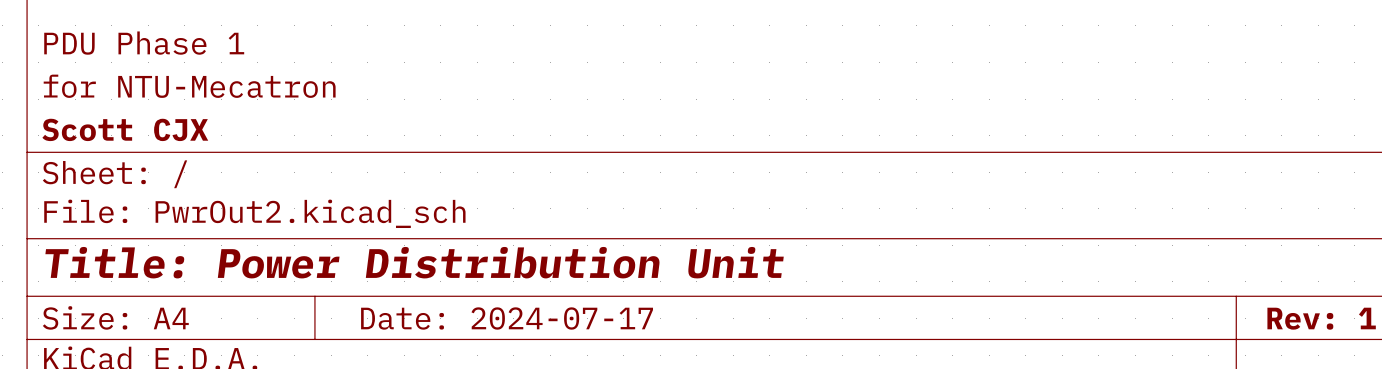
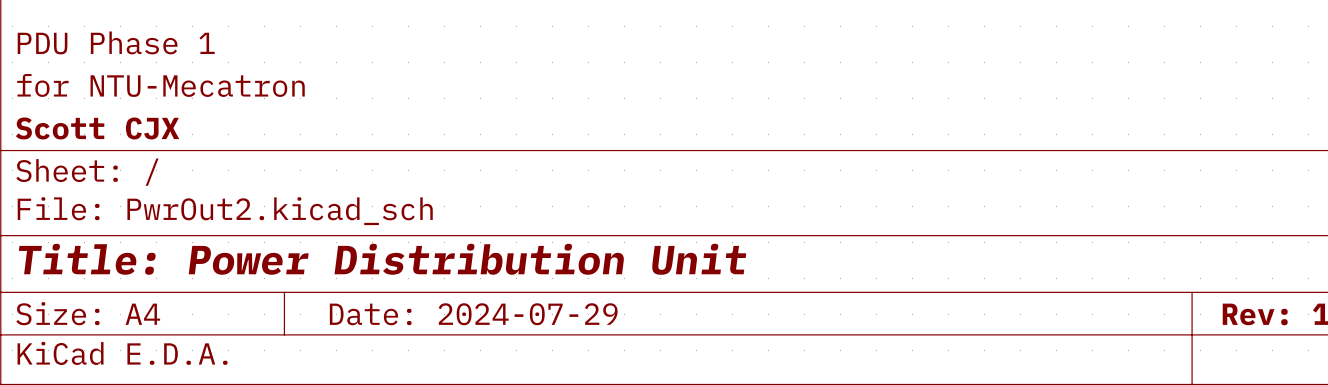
title block: Date: 2024-07-17 (507, 318) -> Date: 2024-07-29 (473, 314)

